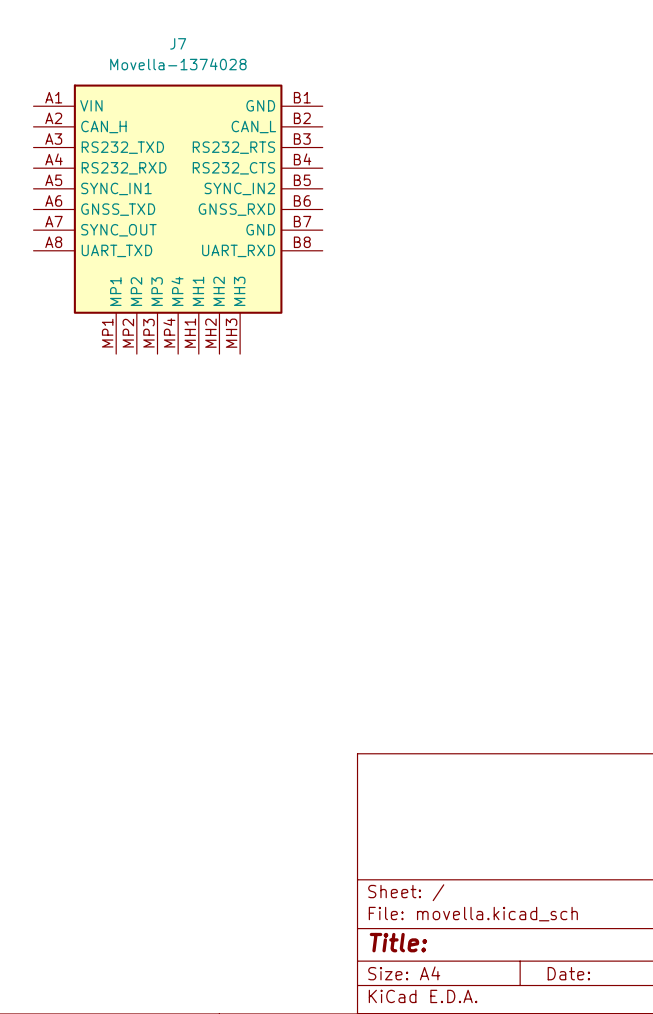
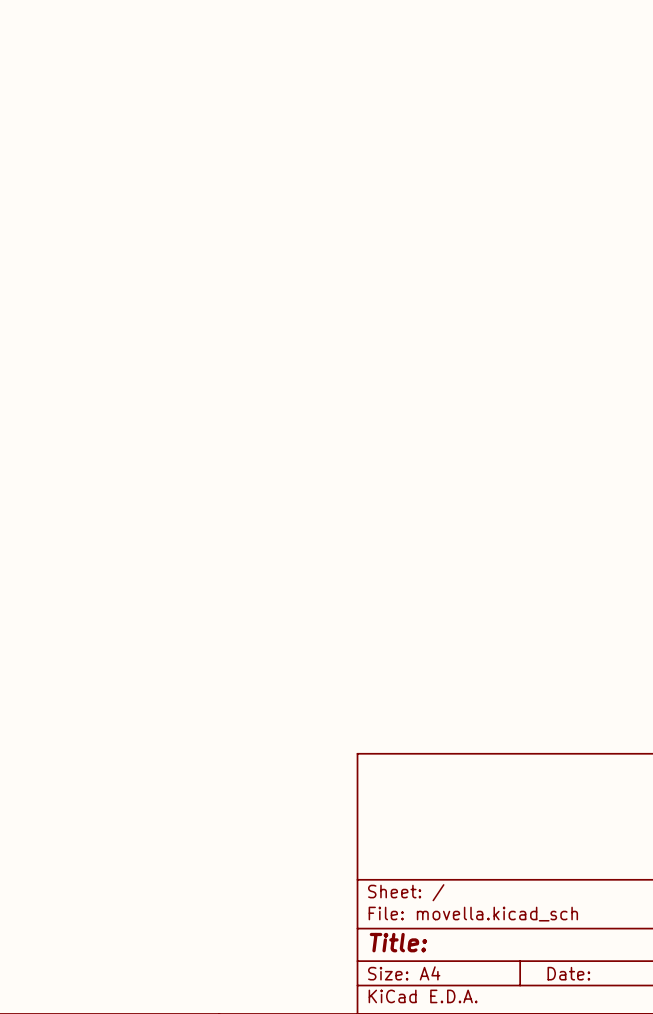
J7: Movella-1374028 (178, 219) -> none

